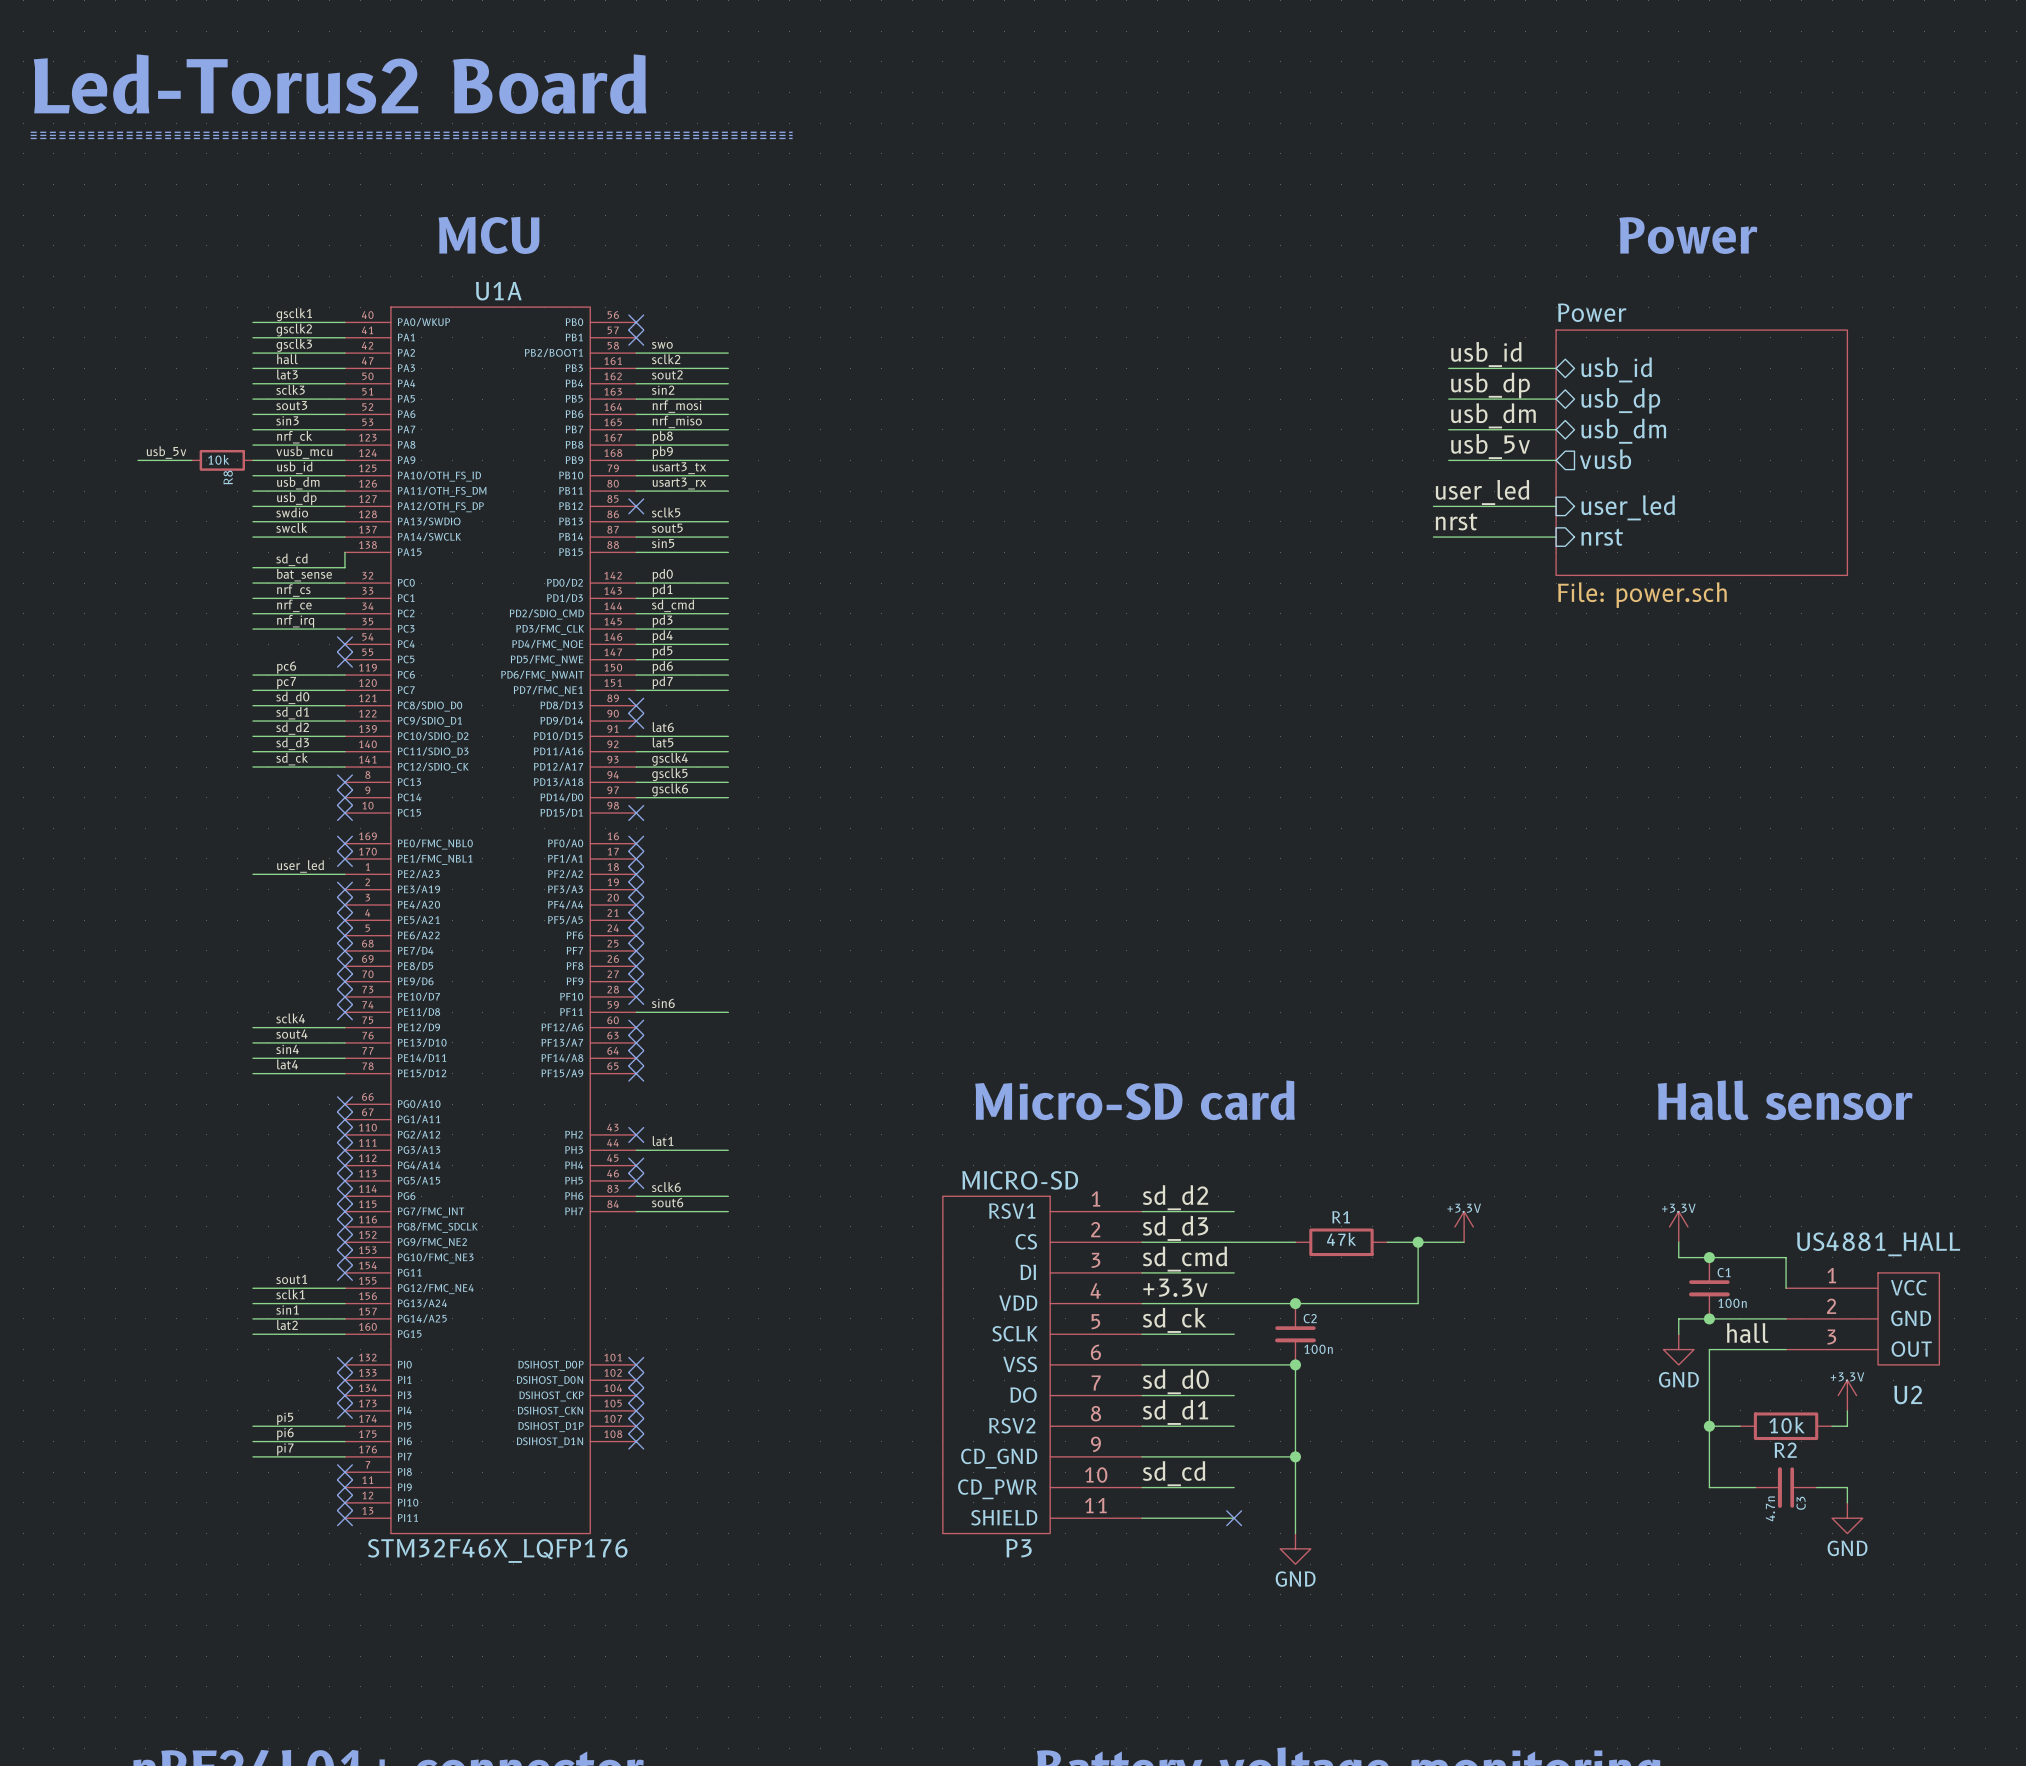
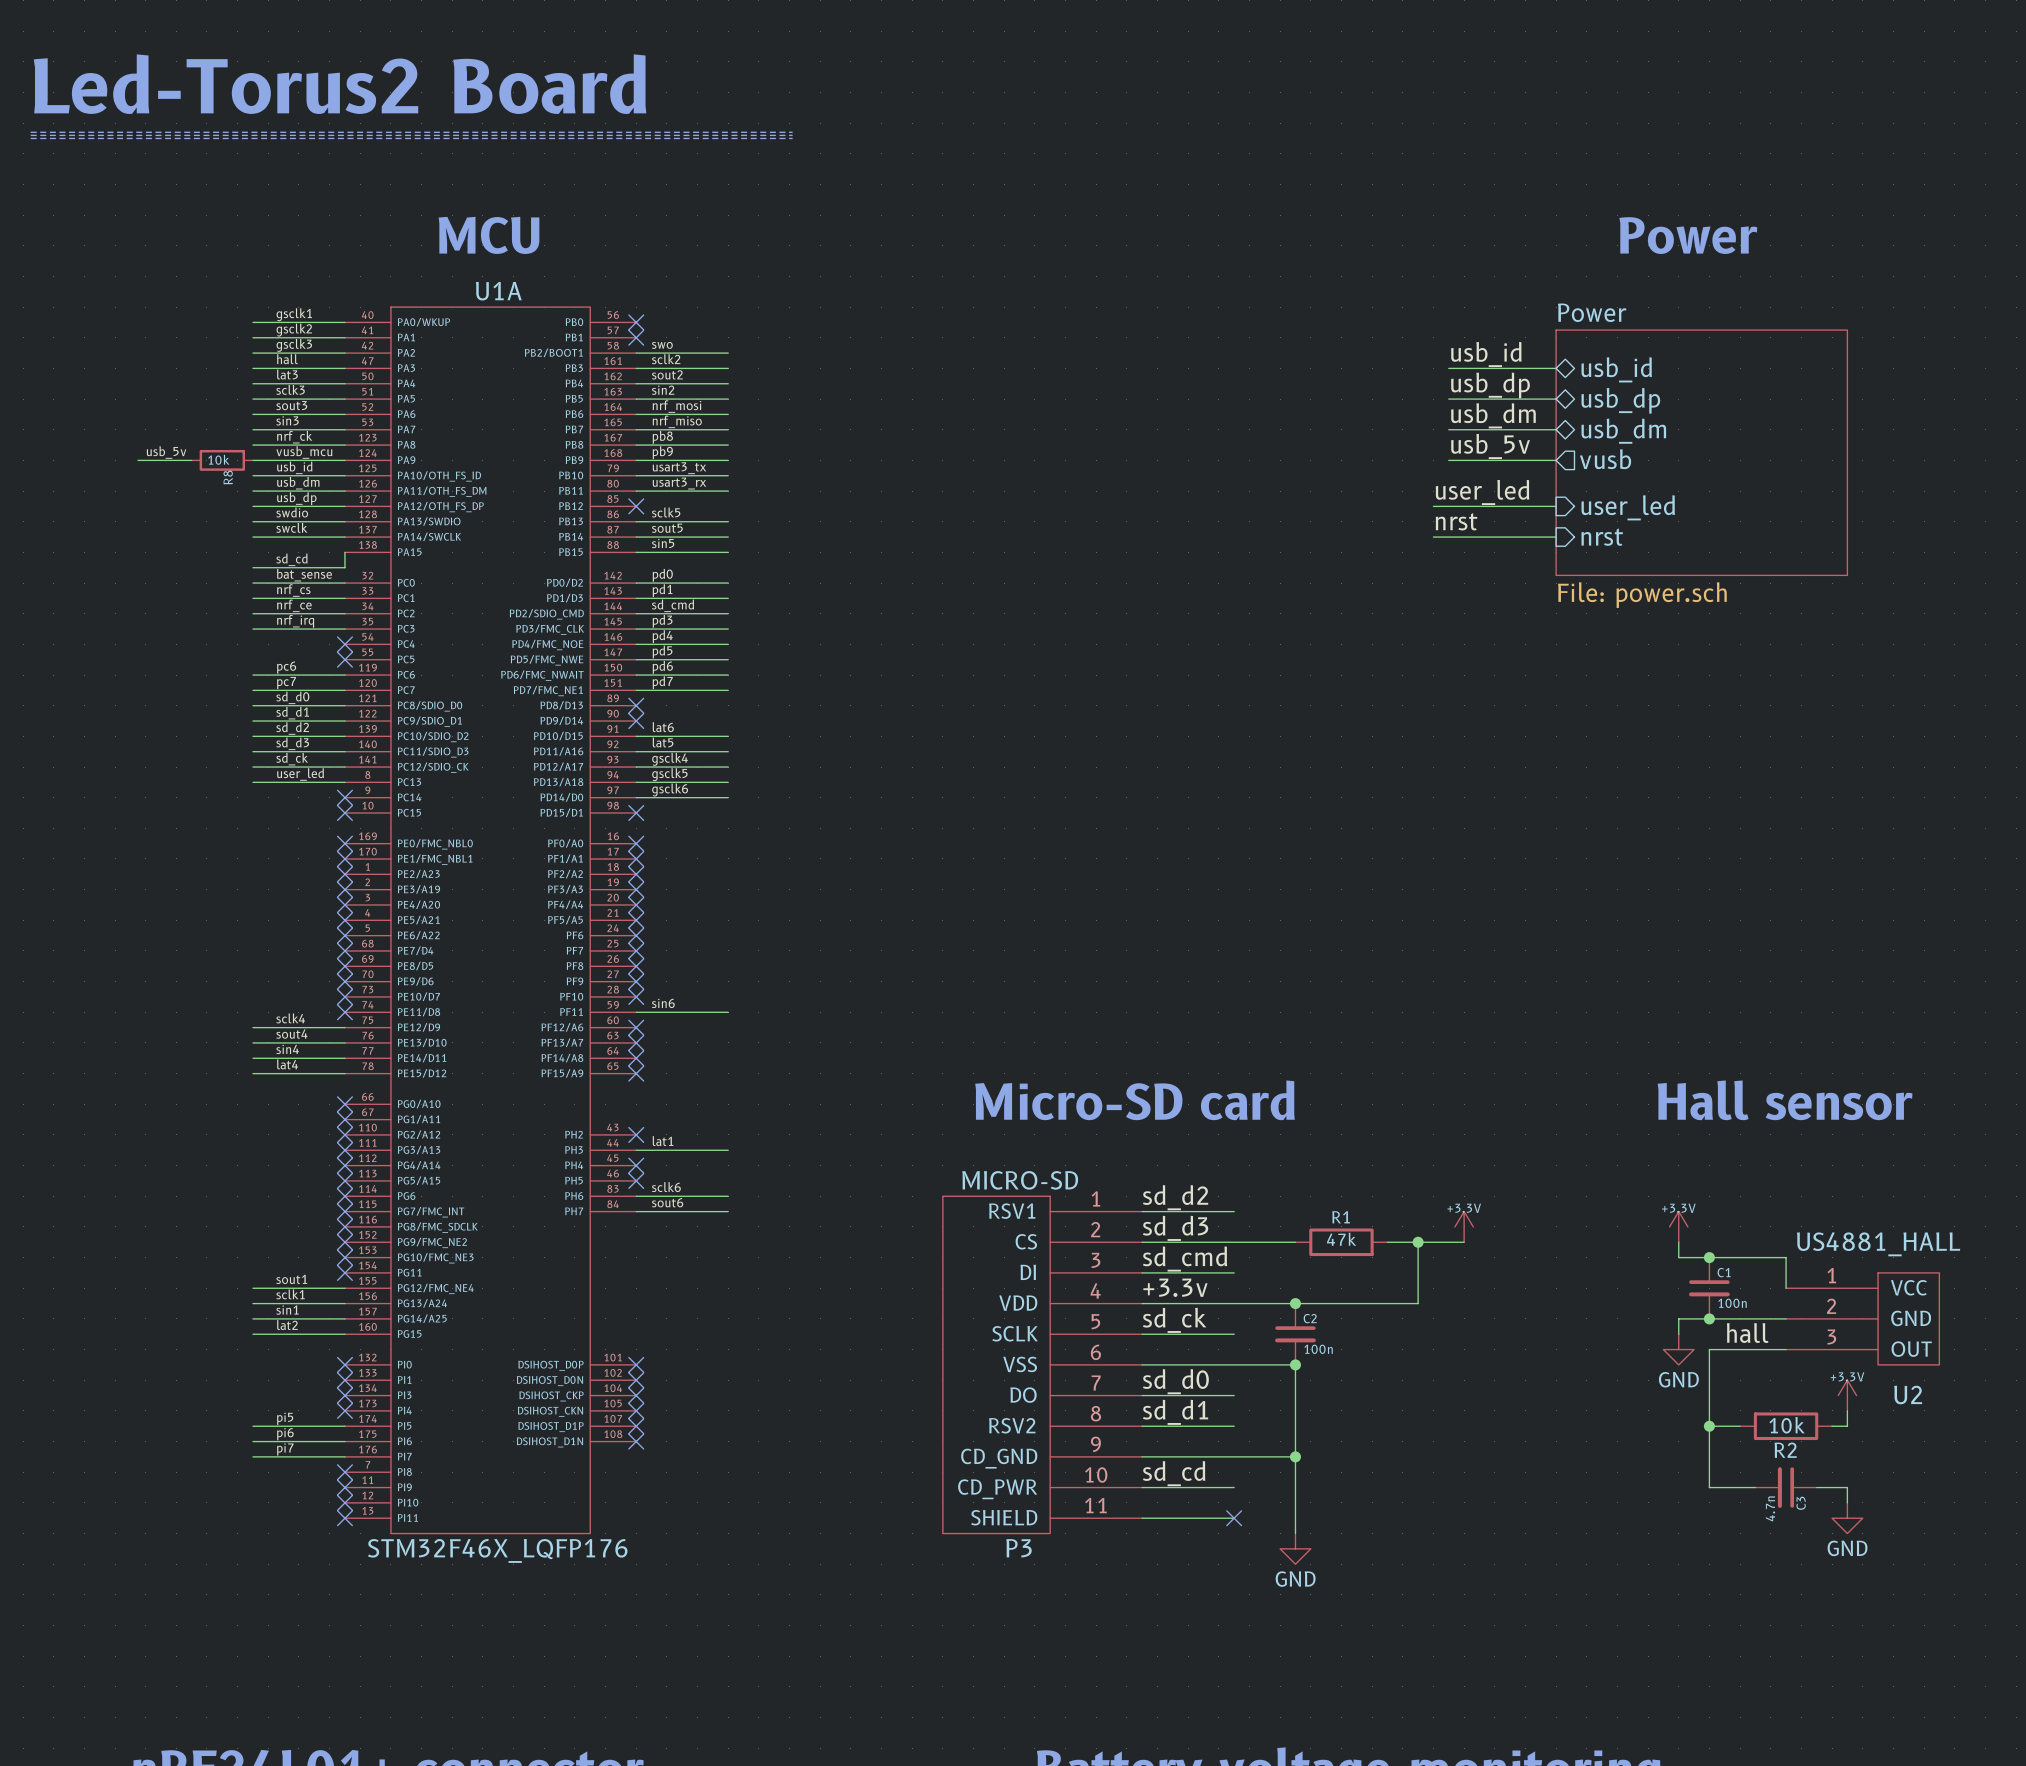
no-connect mark: (344, 782) -> none
label position: user_led (300, 866) -> user_led (300, 774)
wire: (252, 874) (344, 874) -> (252, 782) (344, 782)
no-connect mark: none -> (344, 874)

